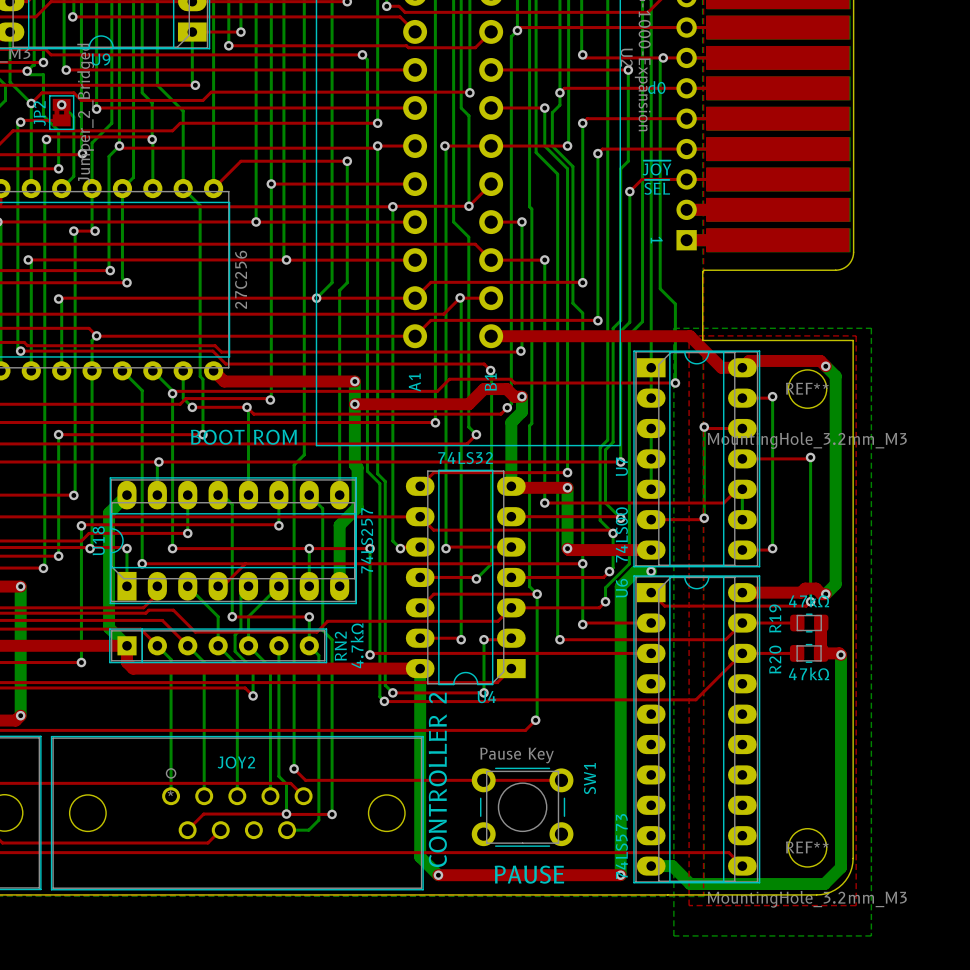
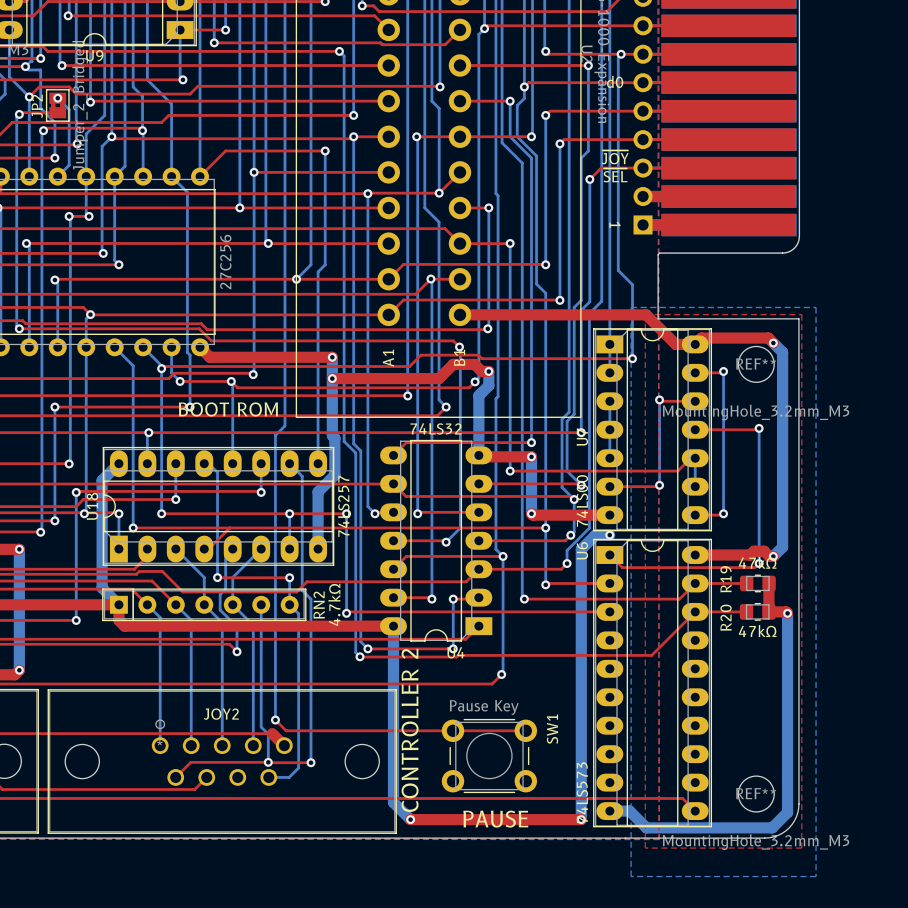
top track width: thin (290, 783) (303, 796) -> thick (272, 733) (284, 745)

